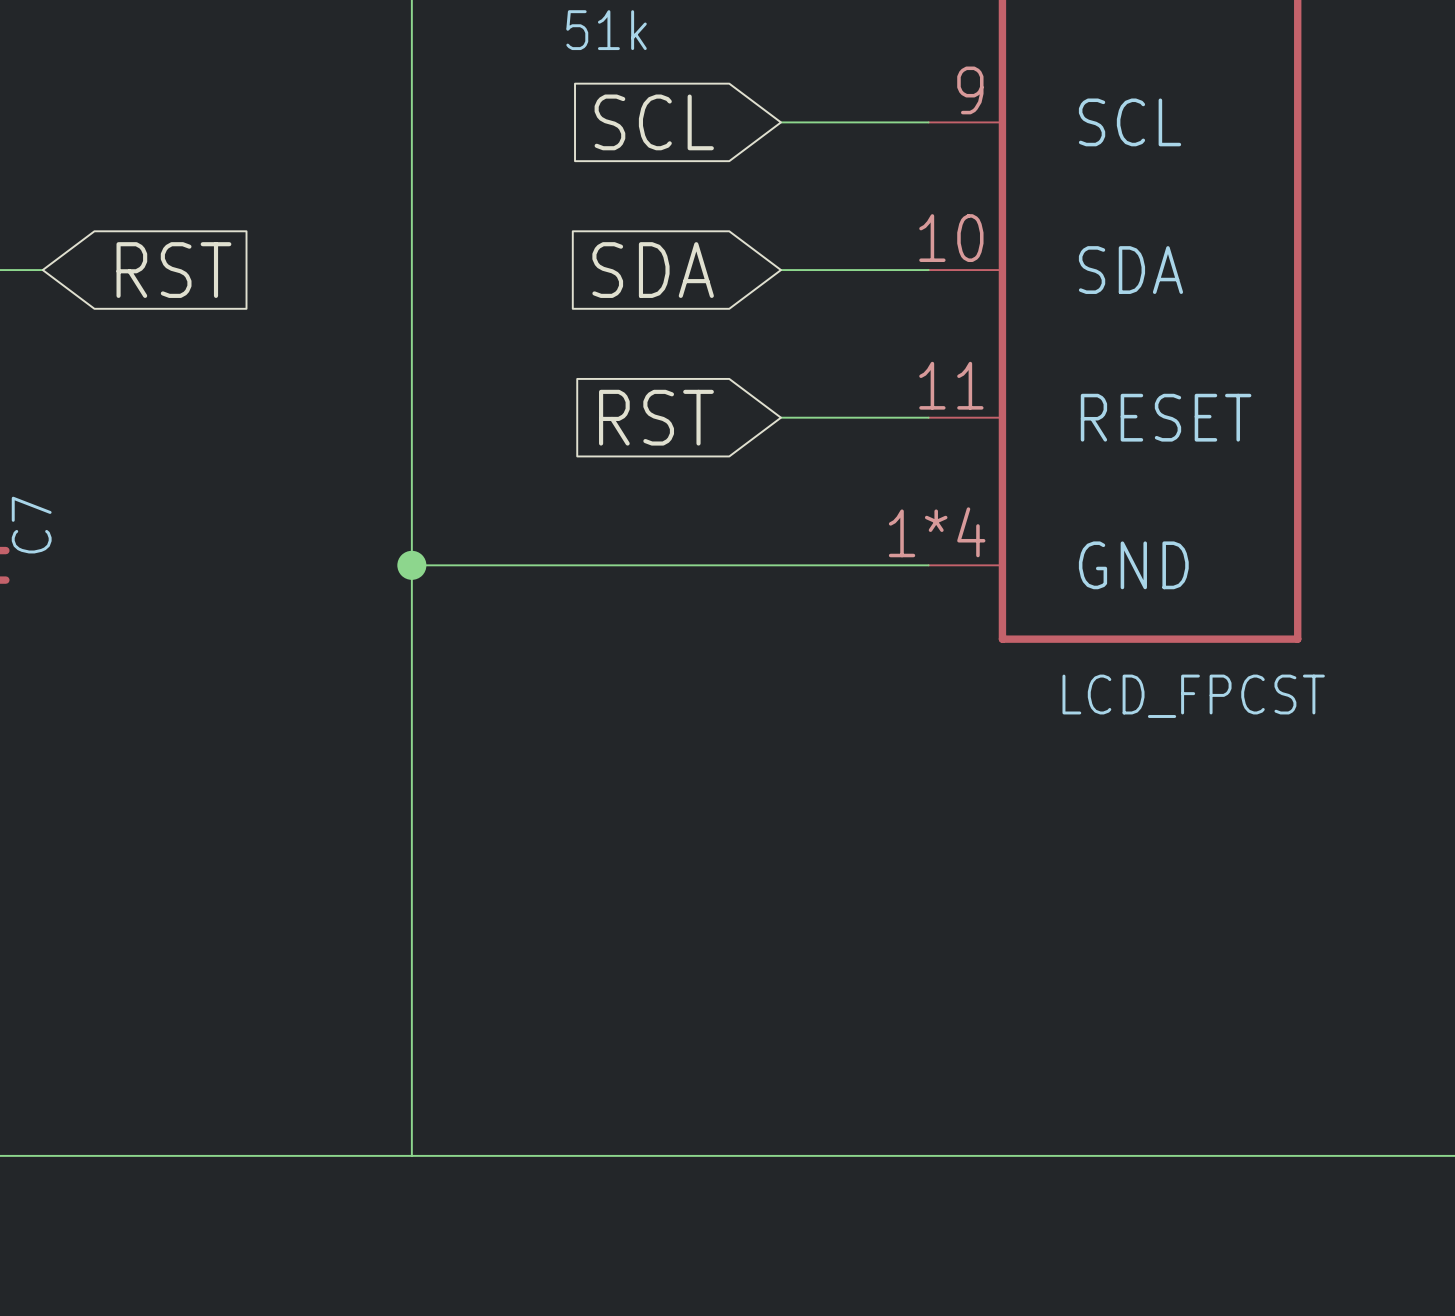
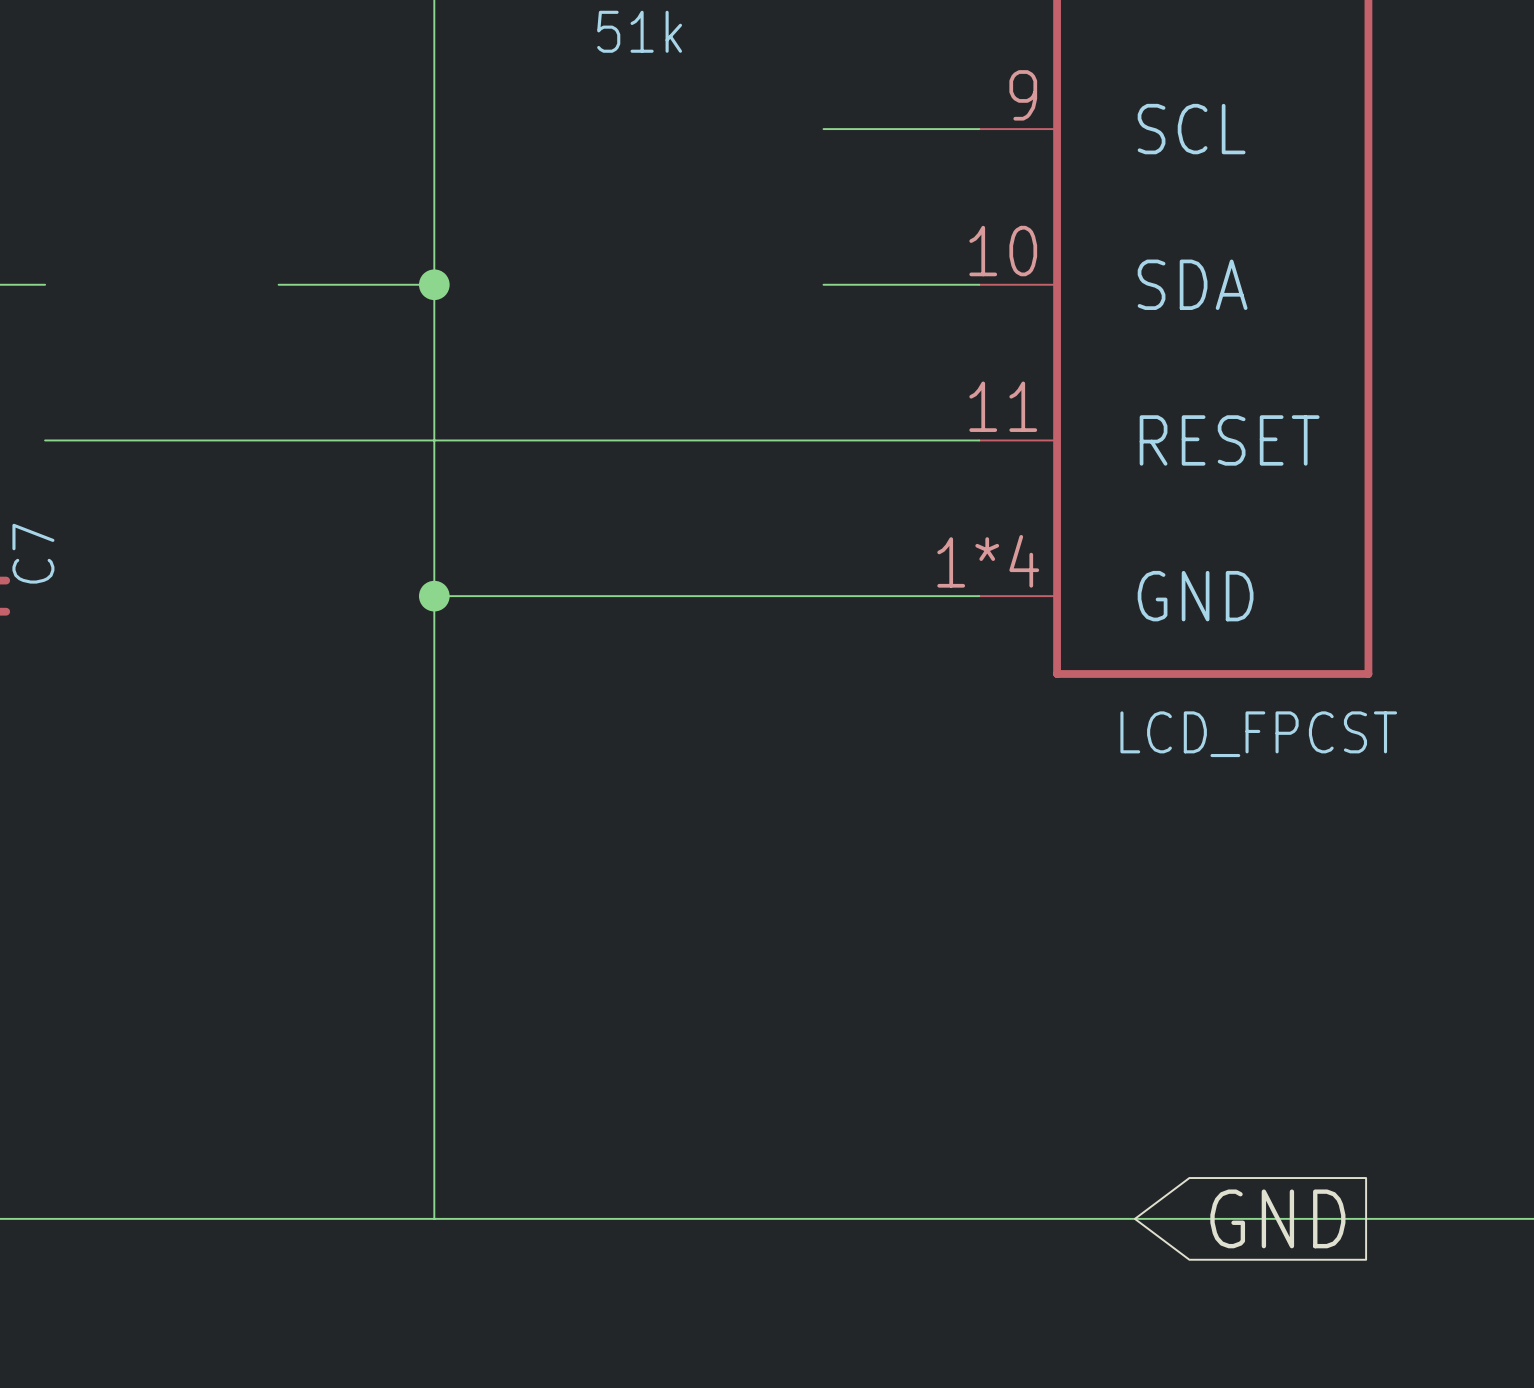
global label: SCL (654, 122) -> none
global label: RST (173, 270) -> none
wire: none -> (278, 284) (434, 284)
junction: none -> (434, 284)
global label: SDA (653, 270) -> none
wire: none -> (45, 440) (823, 440)
global label: RST (656, 417) -> none
global label: none -> GND (1277, 1218)

